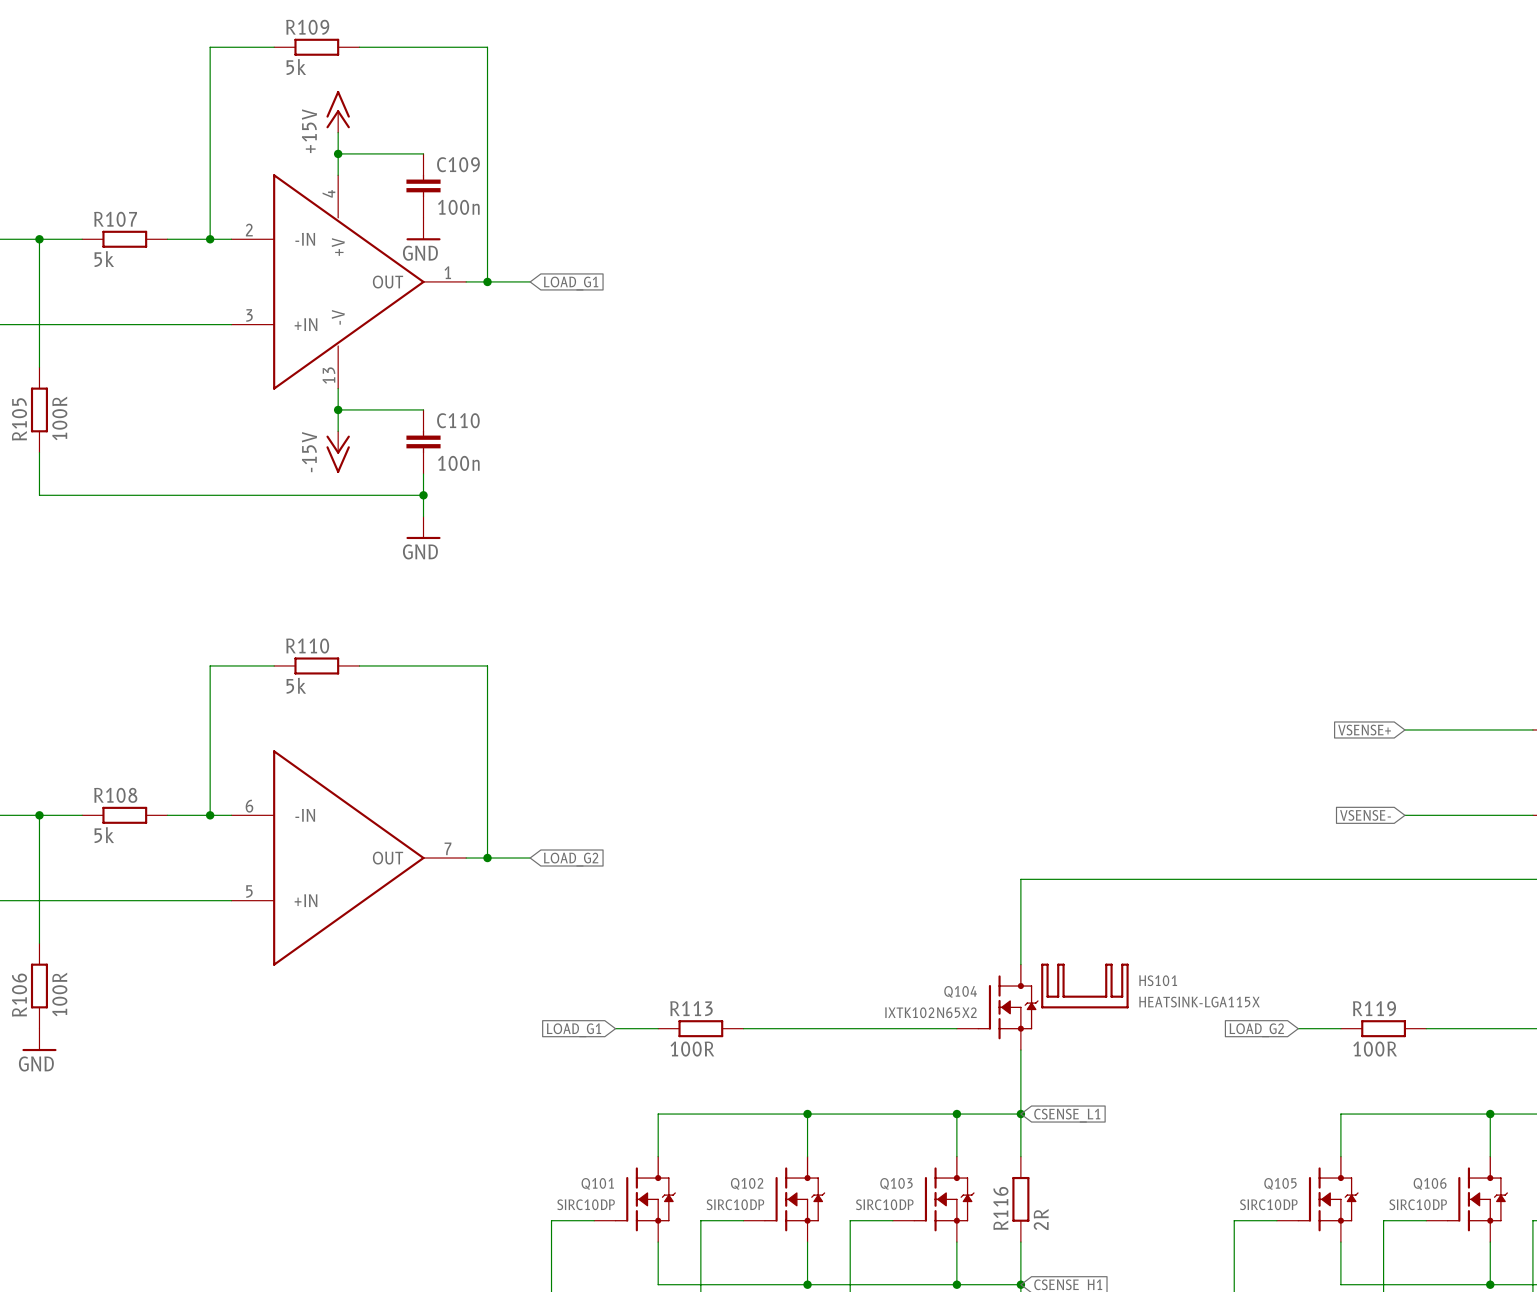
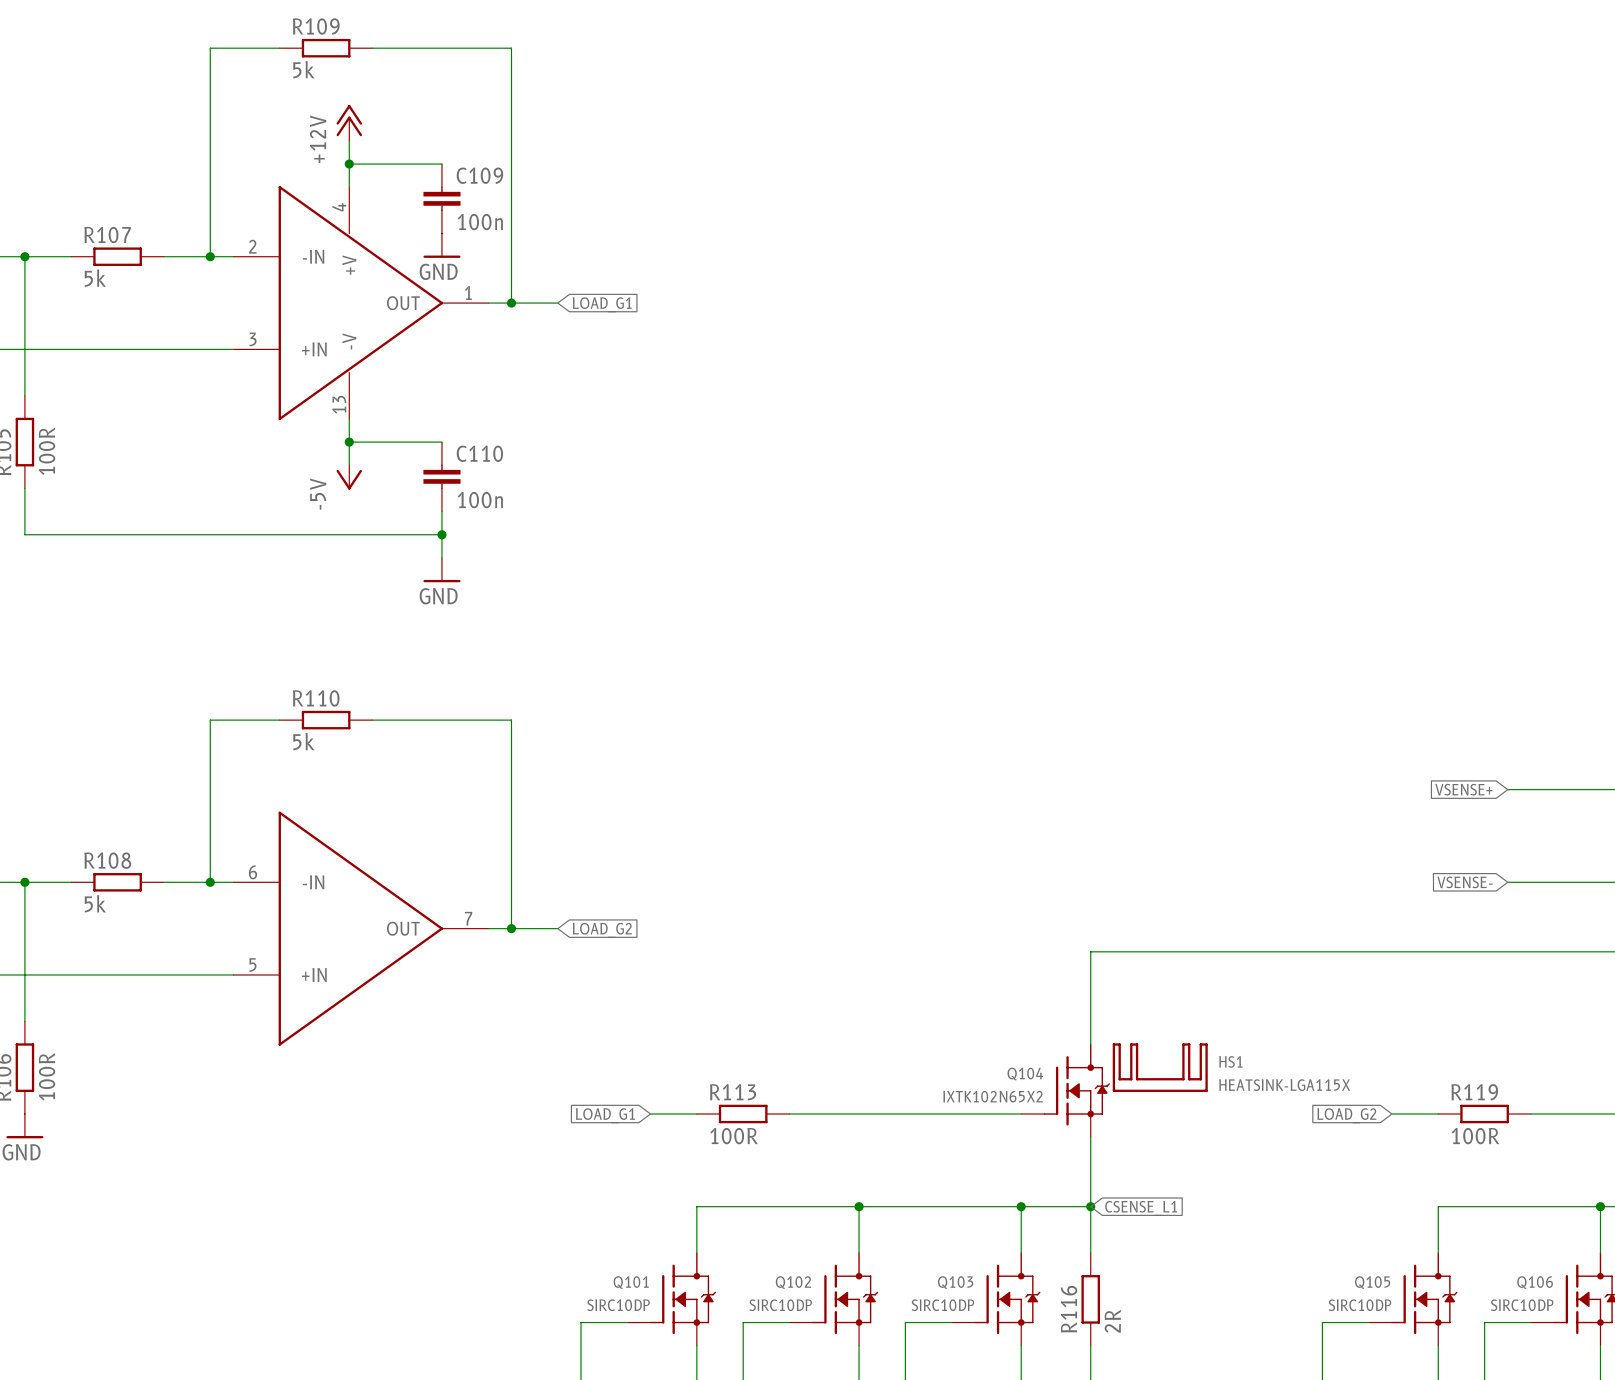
power symbol: +15V (338, 111) -> +12V (349, 122)
power symbol: none -> -5V (349, 477)
power symbol: -15V (338, 452) -> none
HS101 name: HS101 (1158, 980) -> HS1 (1230, 1061)

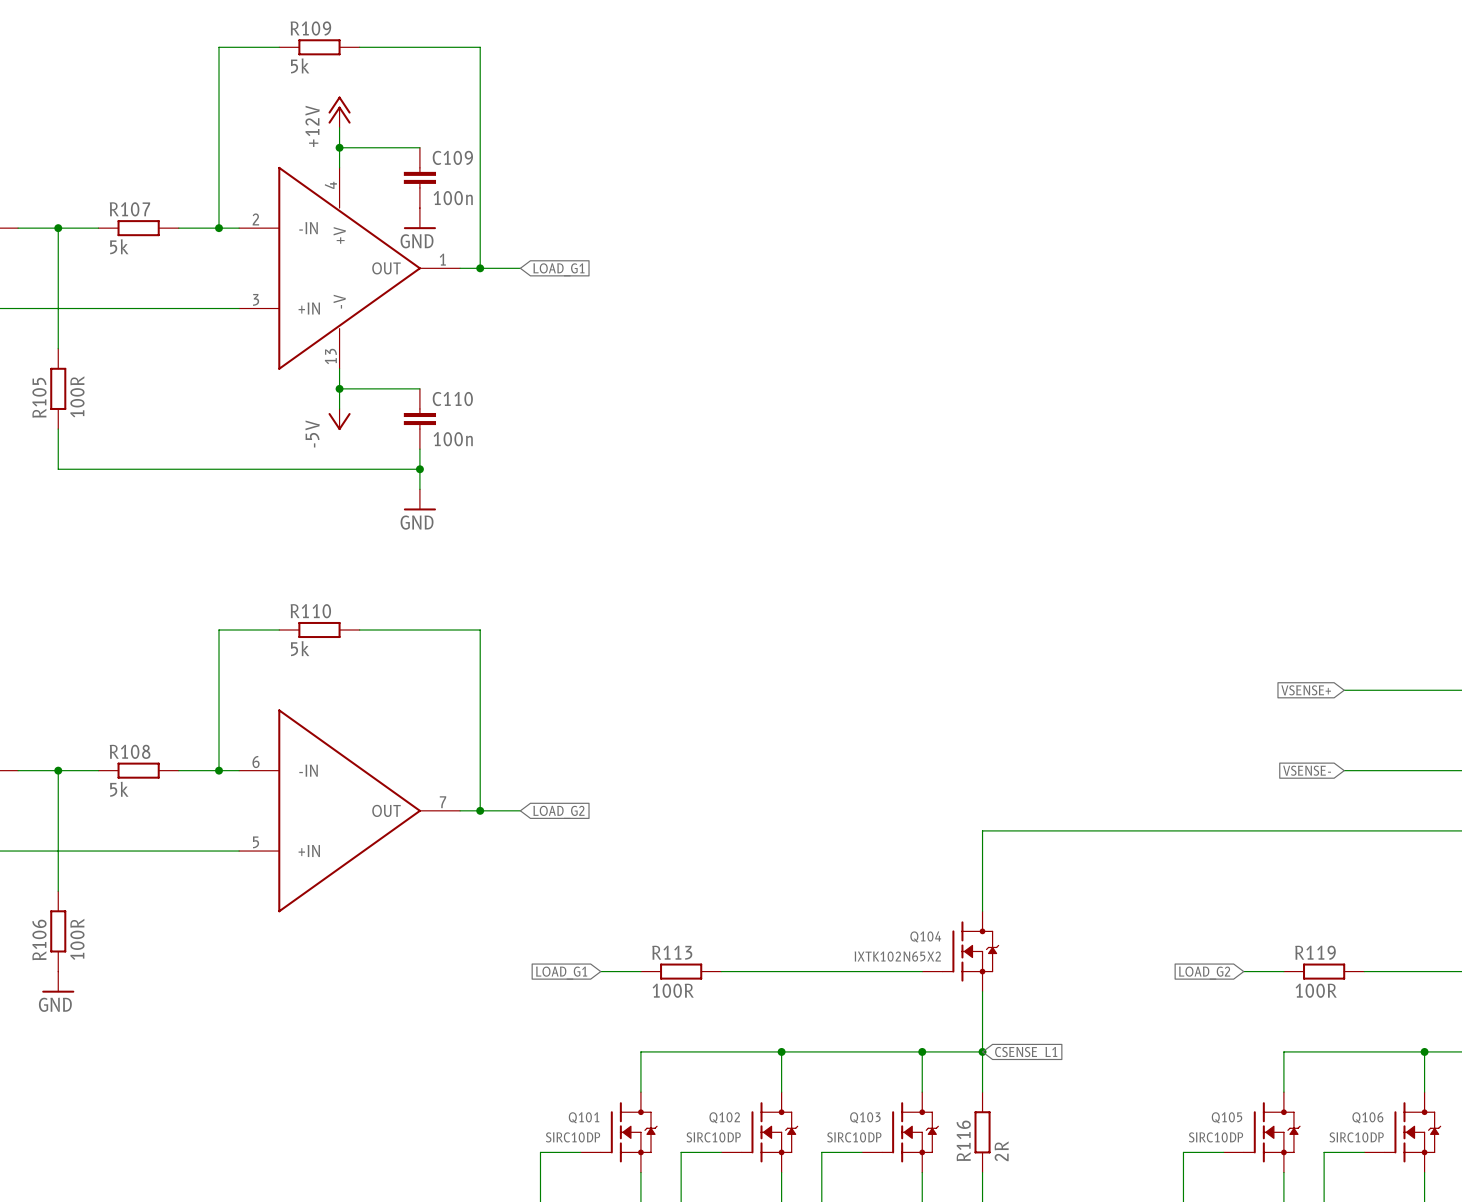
HS1: HEATSINK-LGA115X (1160, 1067) -> none

